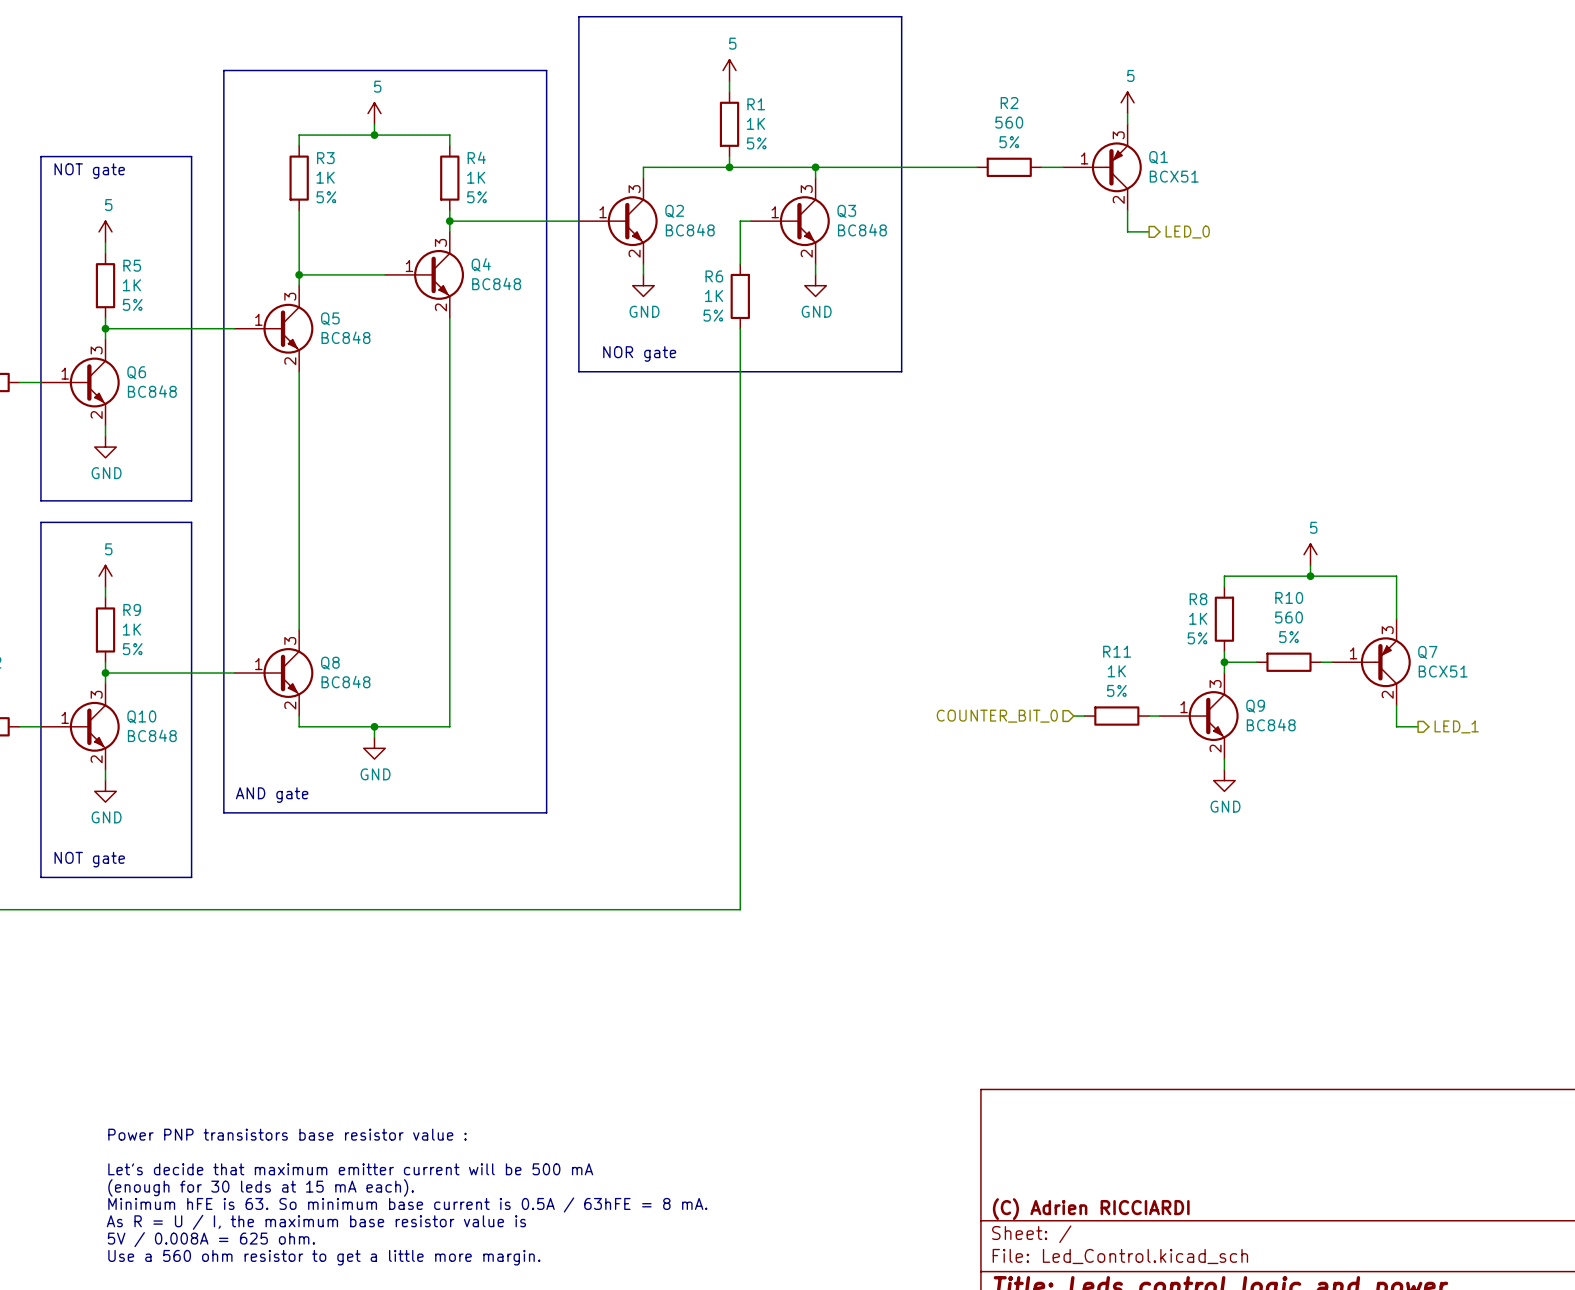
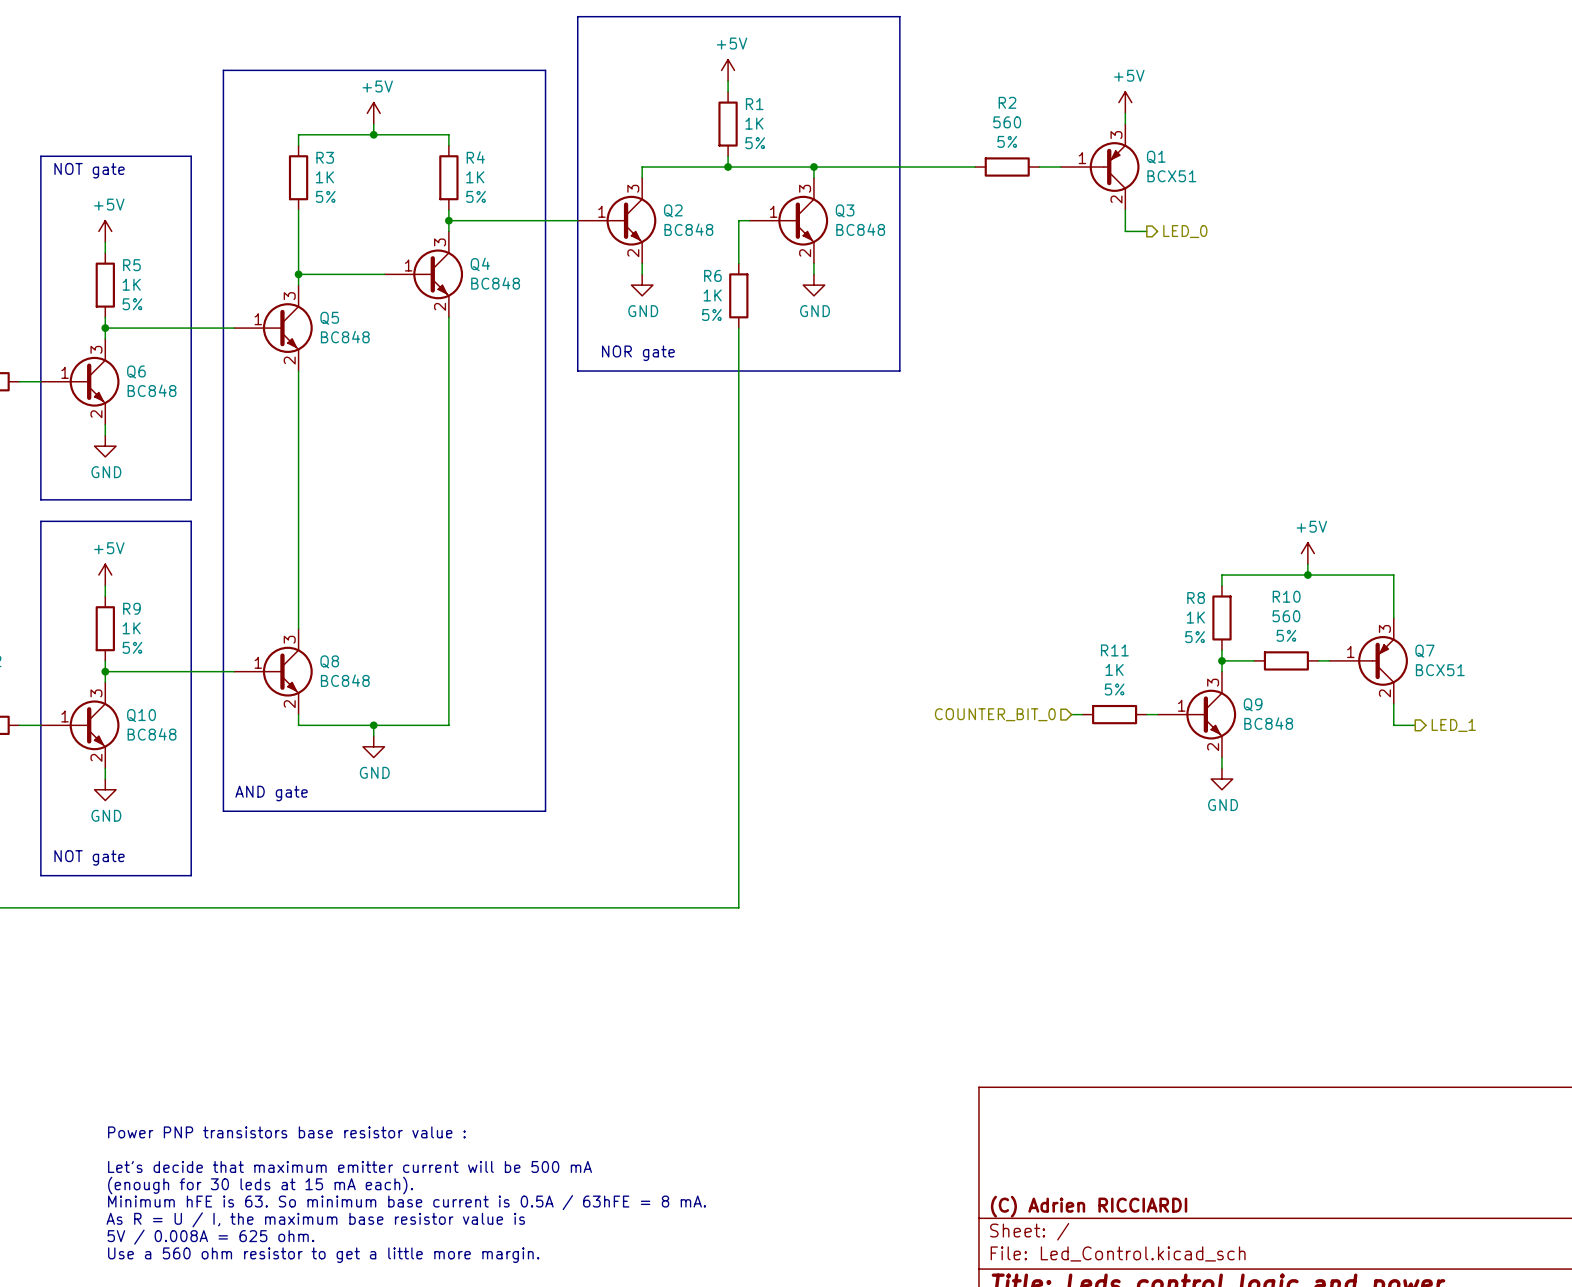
power symbol: 5 (729, 70) -> +5V (728, 70)
power symbol: 5 (1127, 102) -> +5V (1125, 102)
power symbol: 5 (374, 113) -> +5V (373, 113)
power symbol: 5 (105, 231) -> +5V (105, 231)
power symbol: 5 (1310, 554) -> +5V (1307, 553)
power symbol: 5 (105, 576) -> +5V (105, 575)

